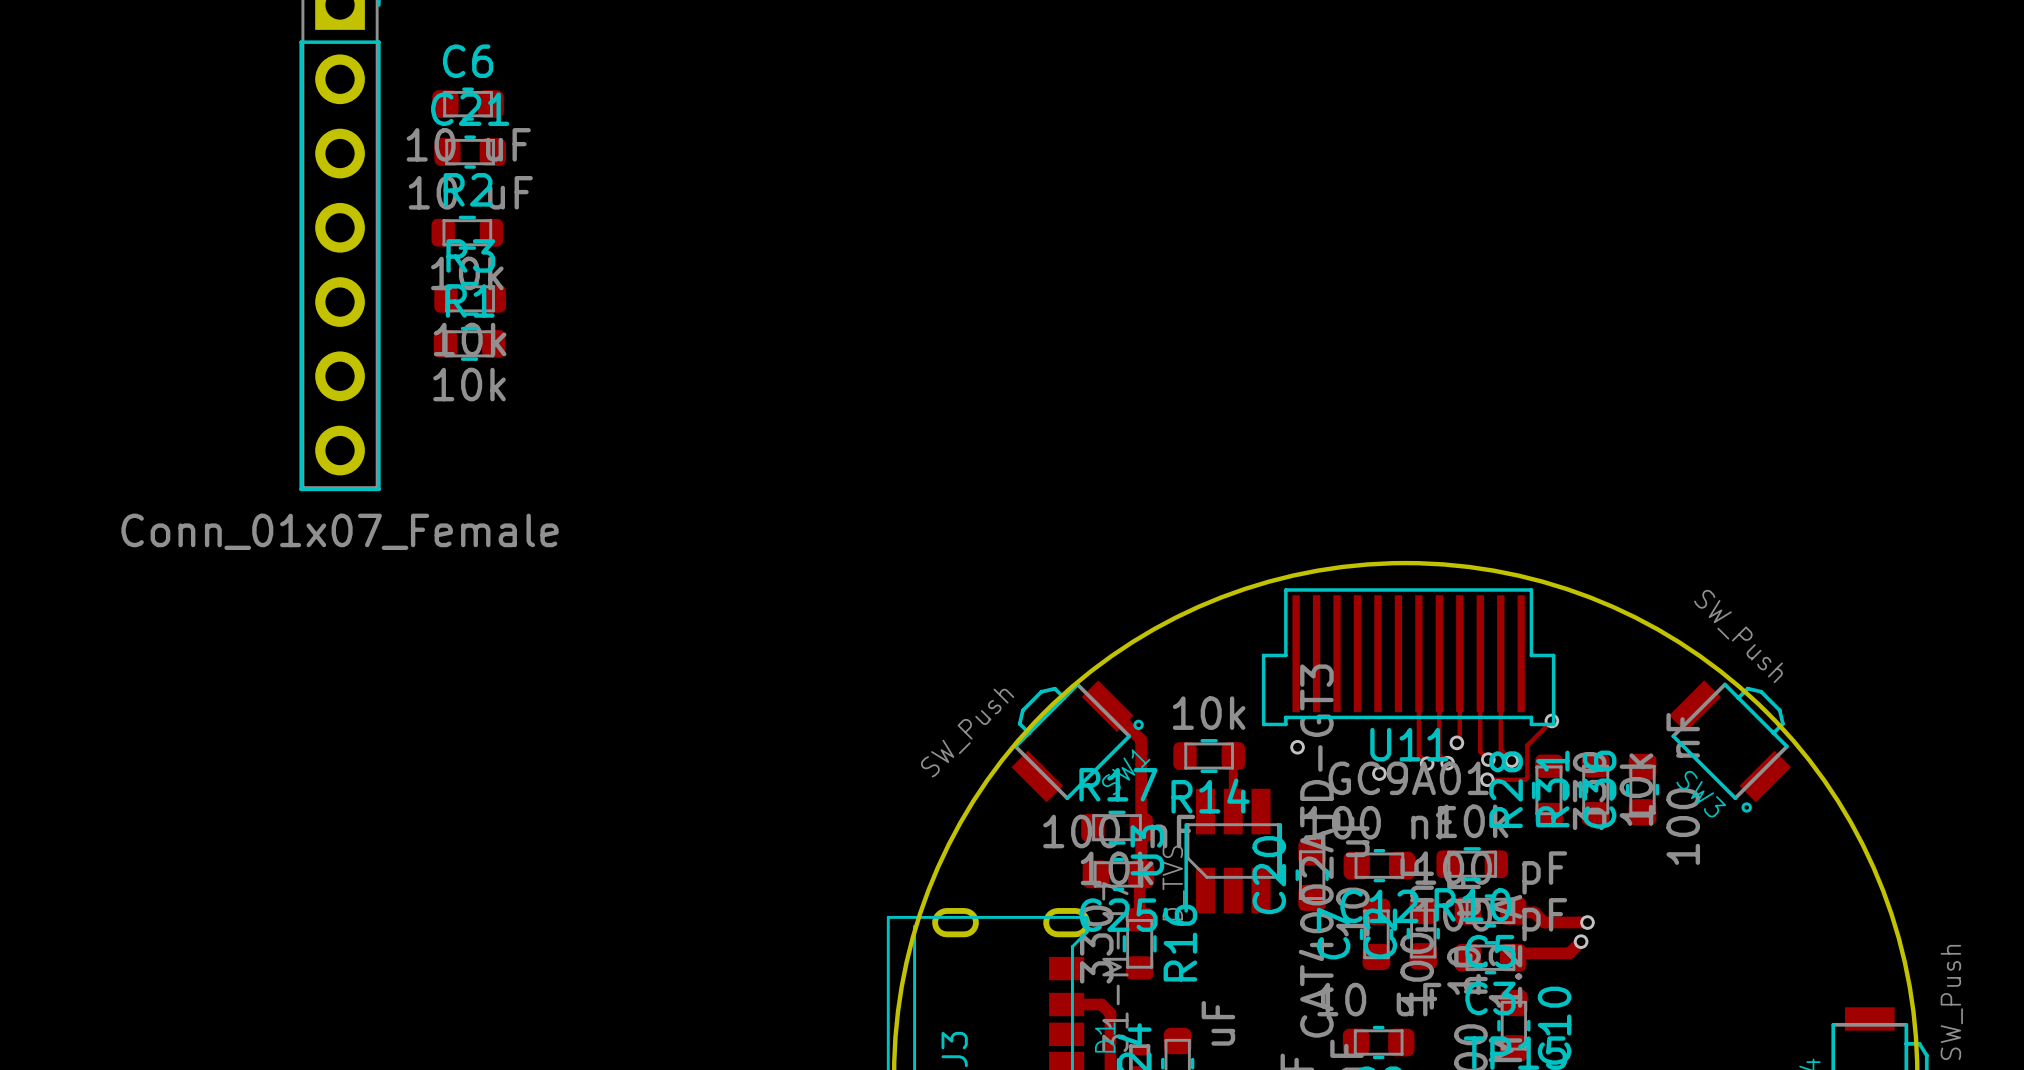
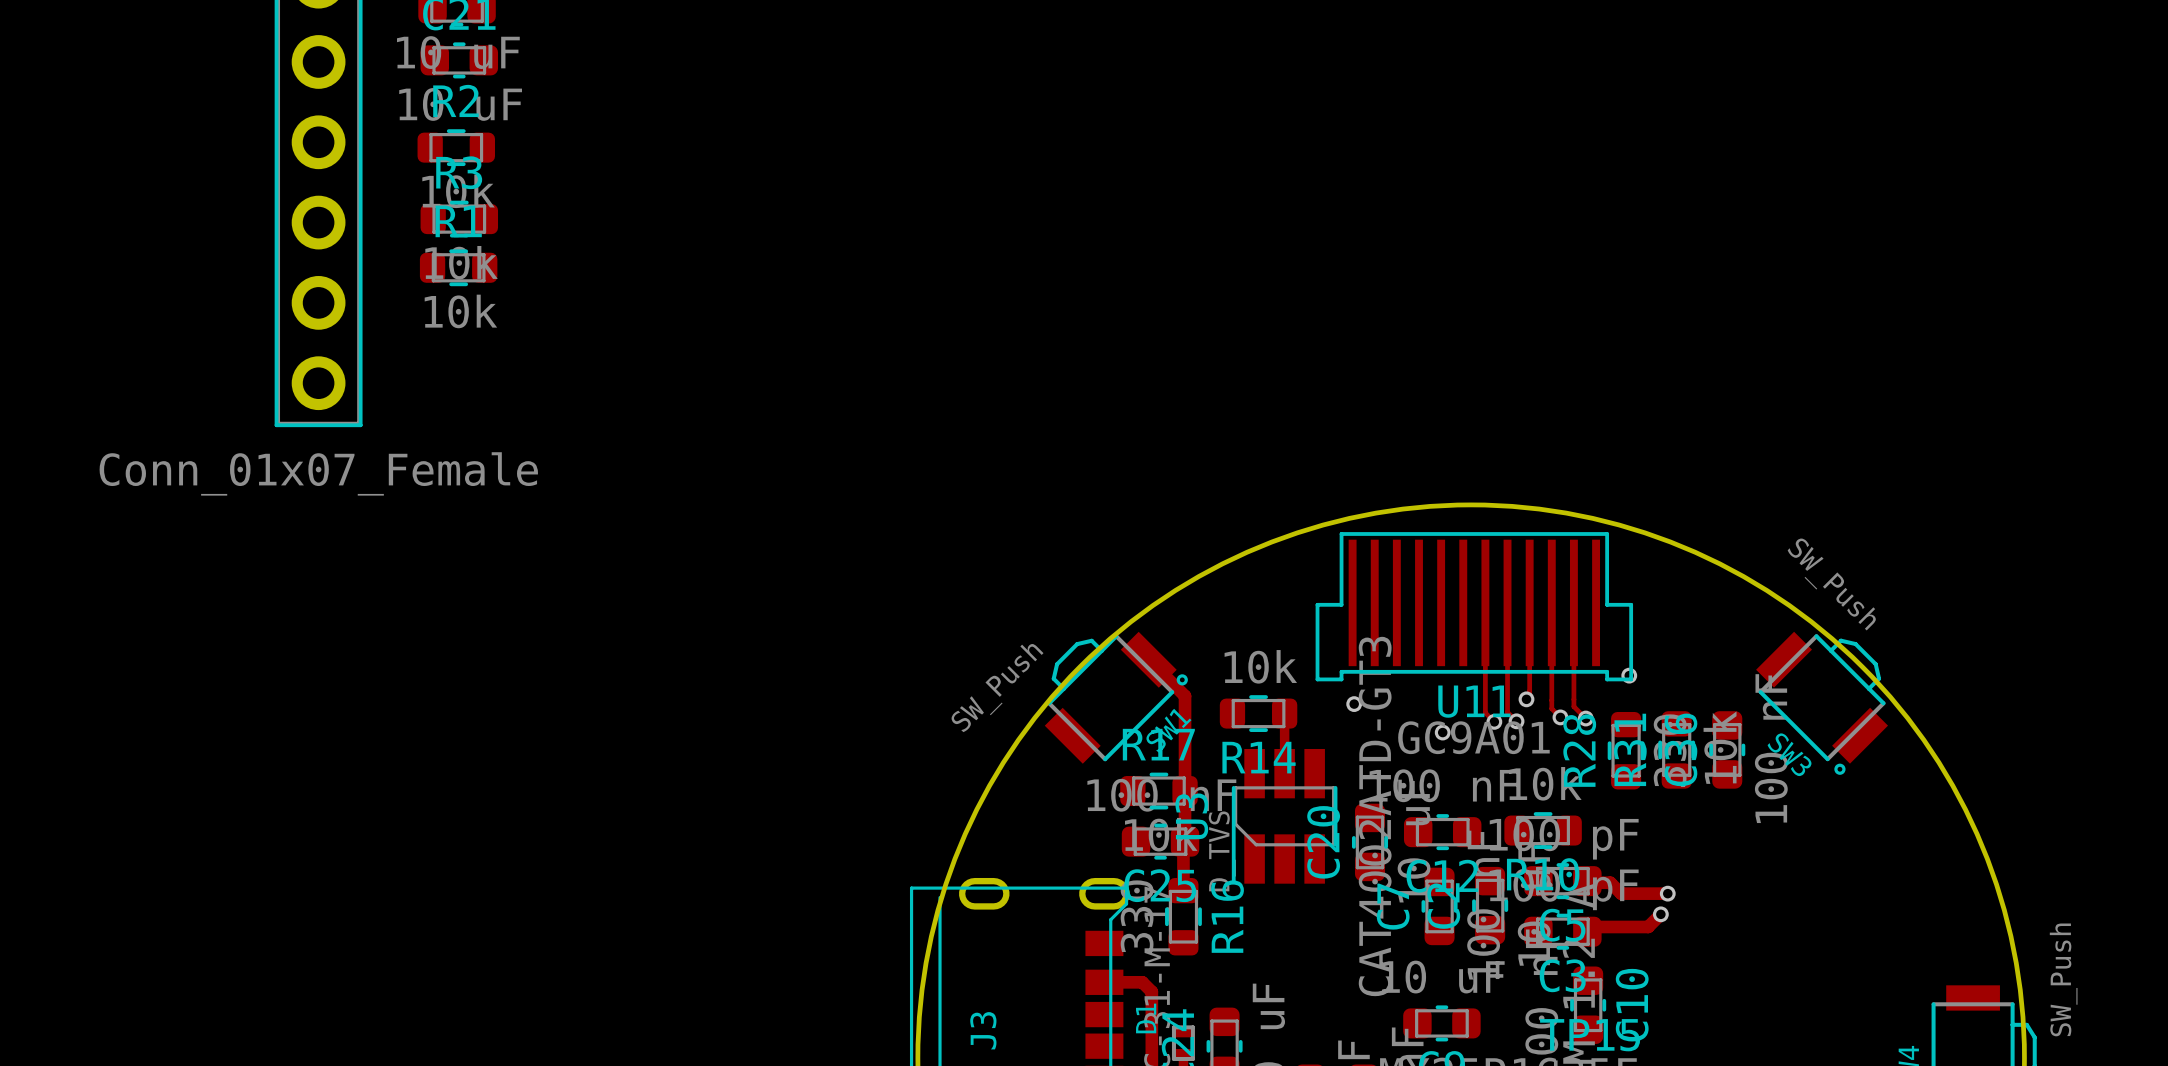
track: (1551, 720) (1527, 745) (1527, 777) (1525, 779) (1487, 779) -> none
via: (1487, 779) -> none

